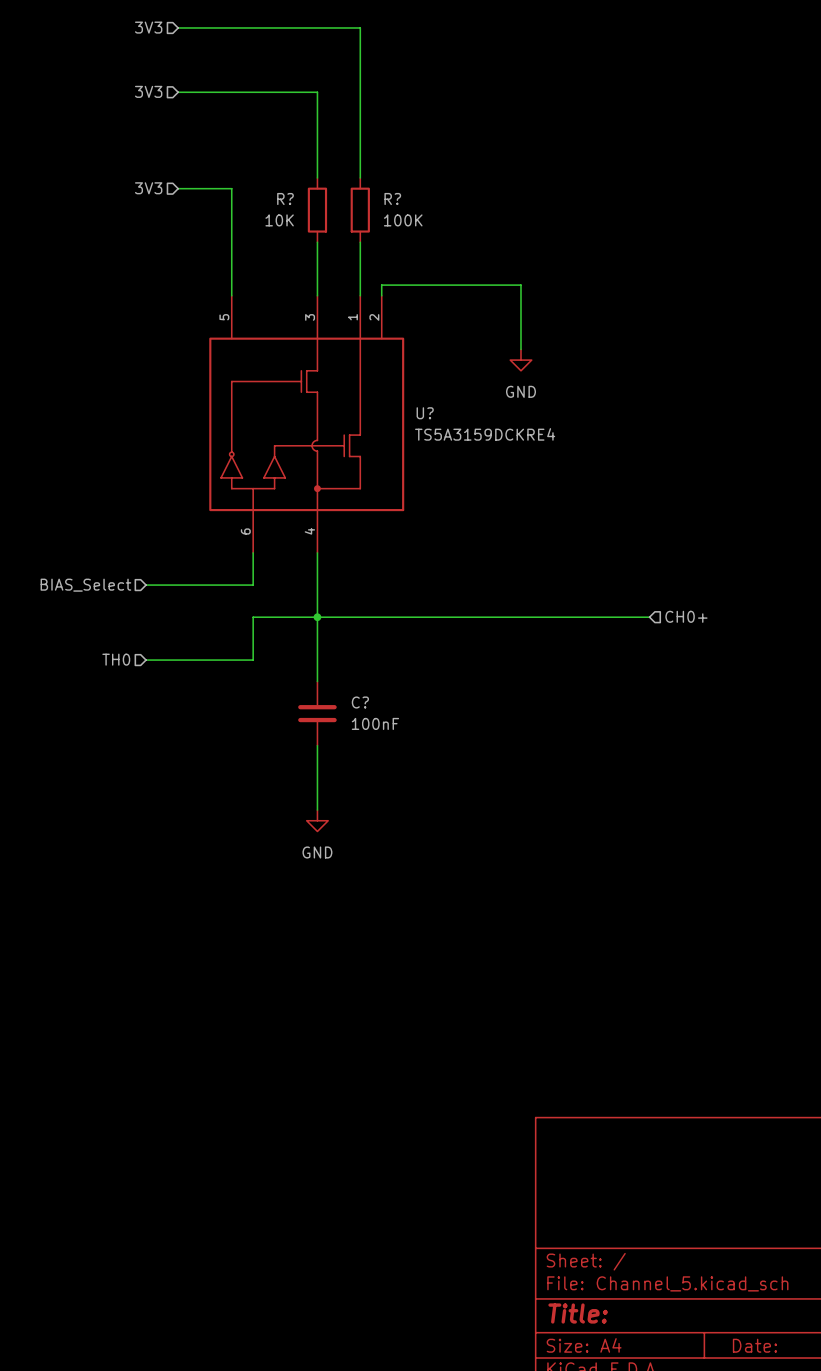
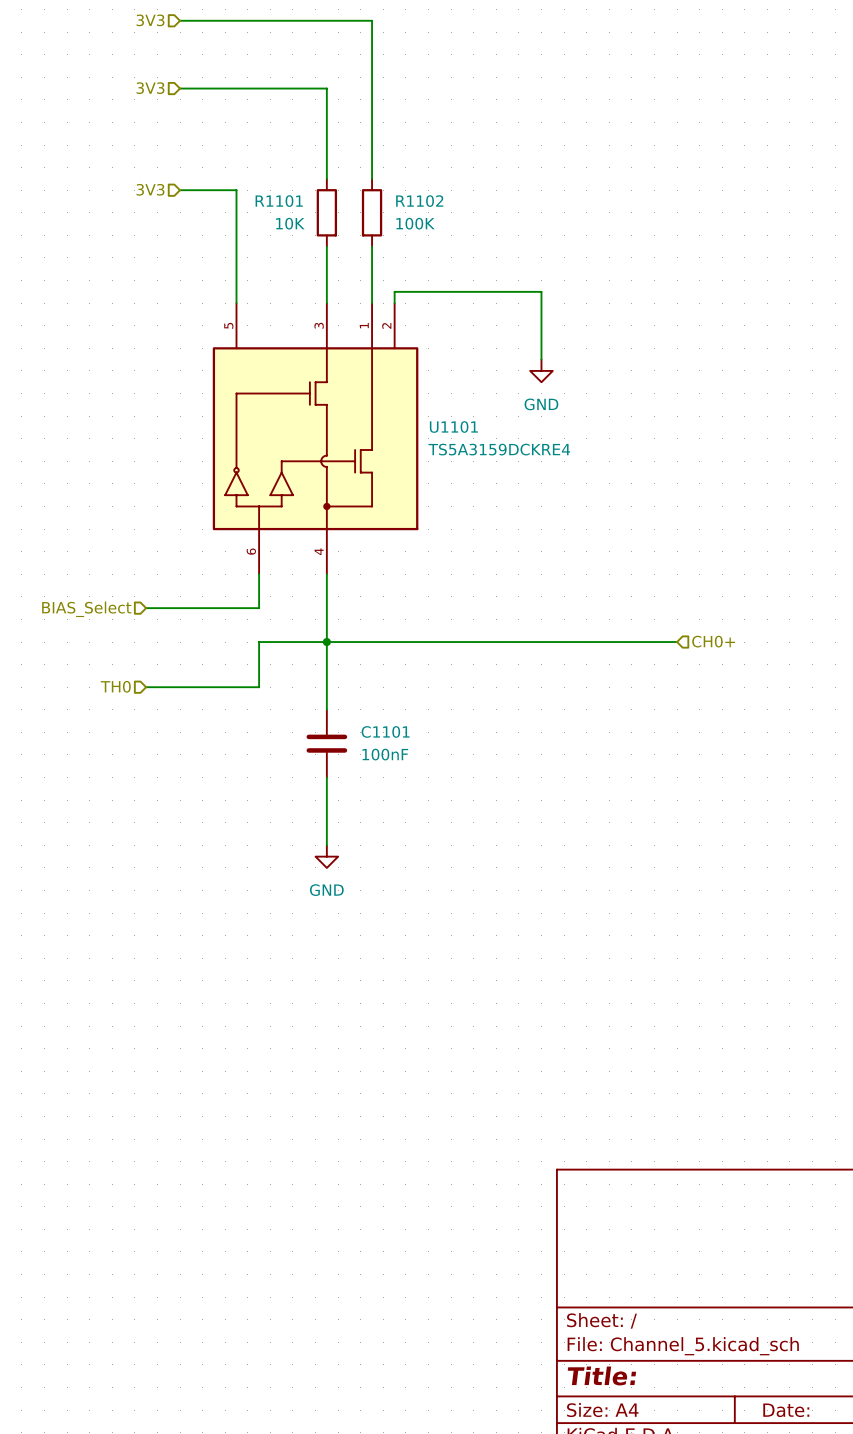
R? name: R? (285, 198) -> R1101 (279, 201)
R? name: R? (392, 198) -> R1102 (419, 201)
U? name: U? (425, 413) -> U1101 (453, 426)
C? name: C? (360, 702) -> C1101 (385, 731)

